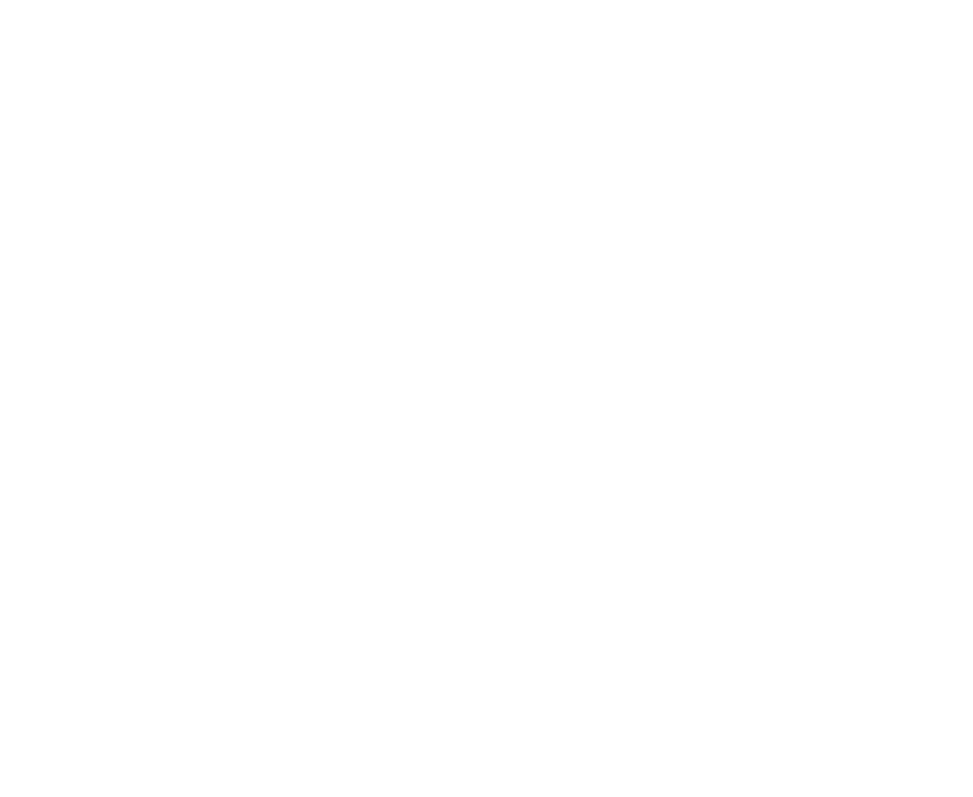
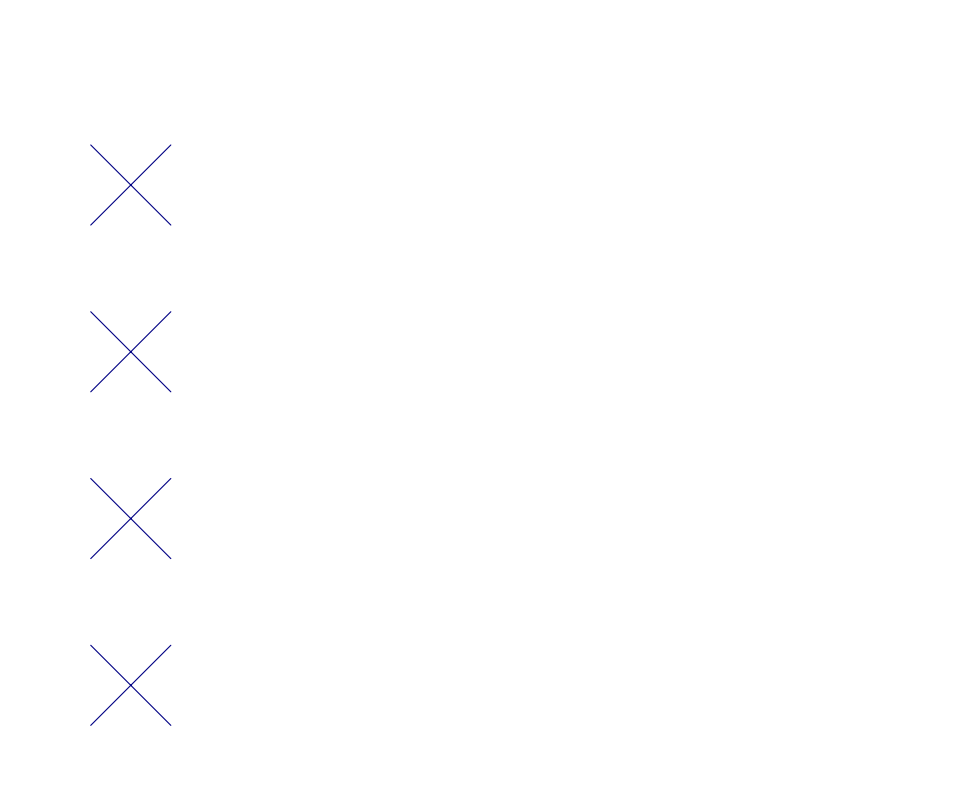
no-connect mark: none -> (130, 185)
no-connect mark: none -> (130, 351)
no-connect mark: none -> (130, 518)
no-connect mark: none -> (130, 685)

